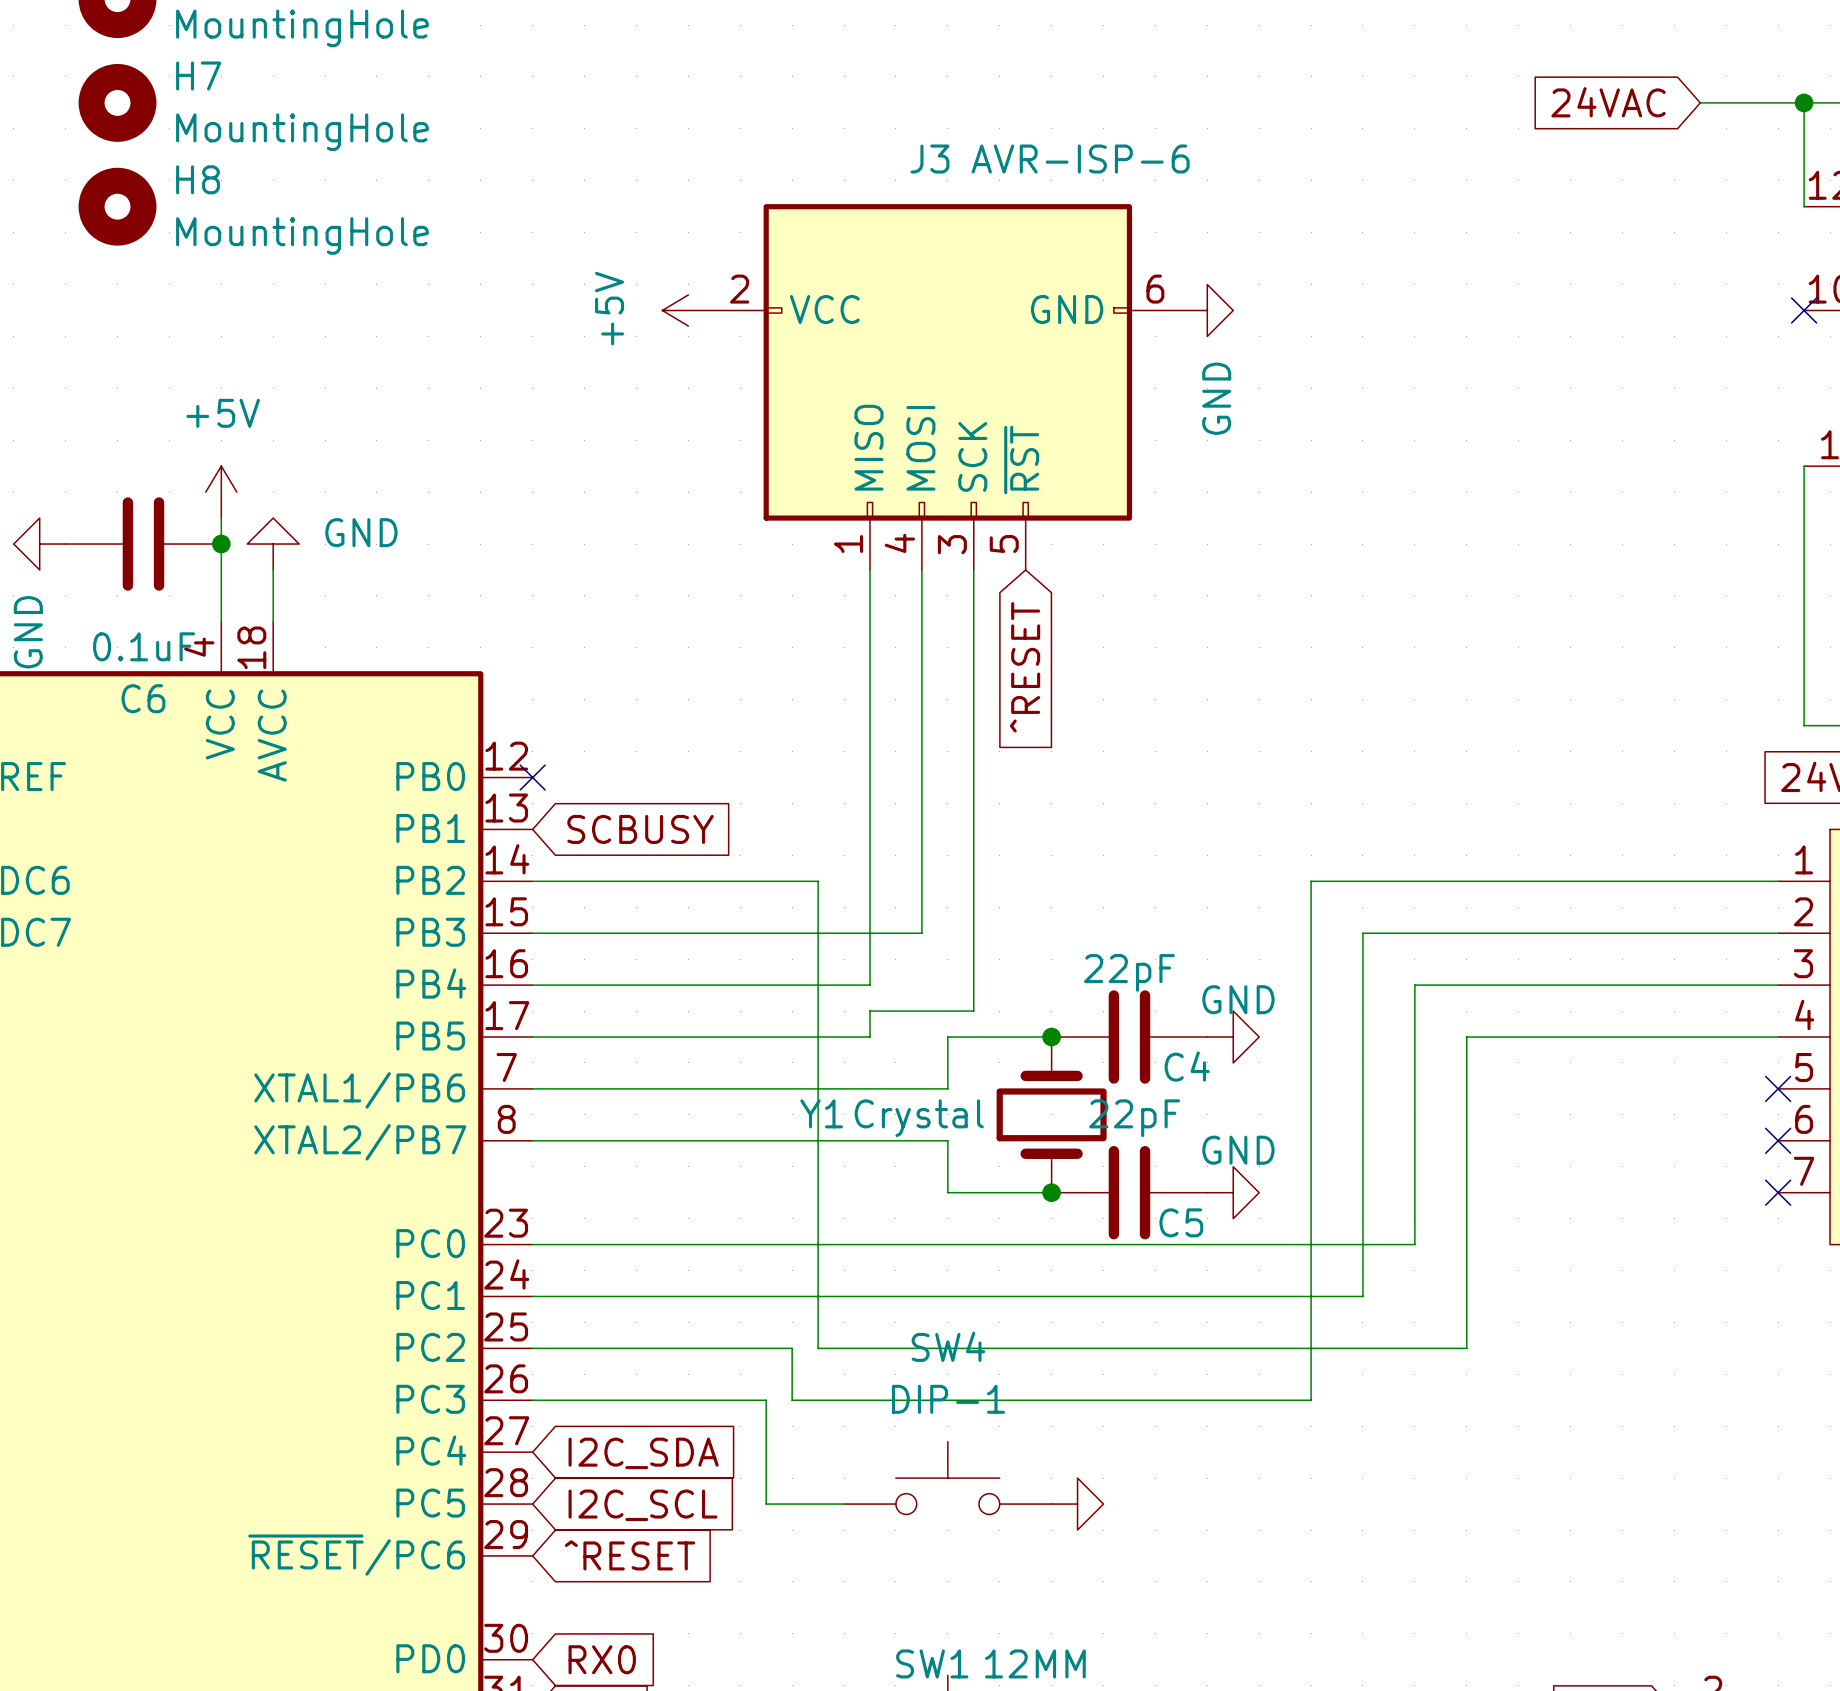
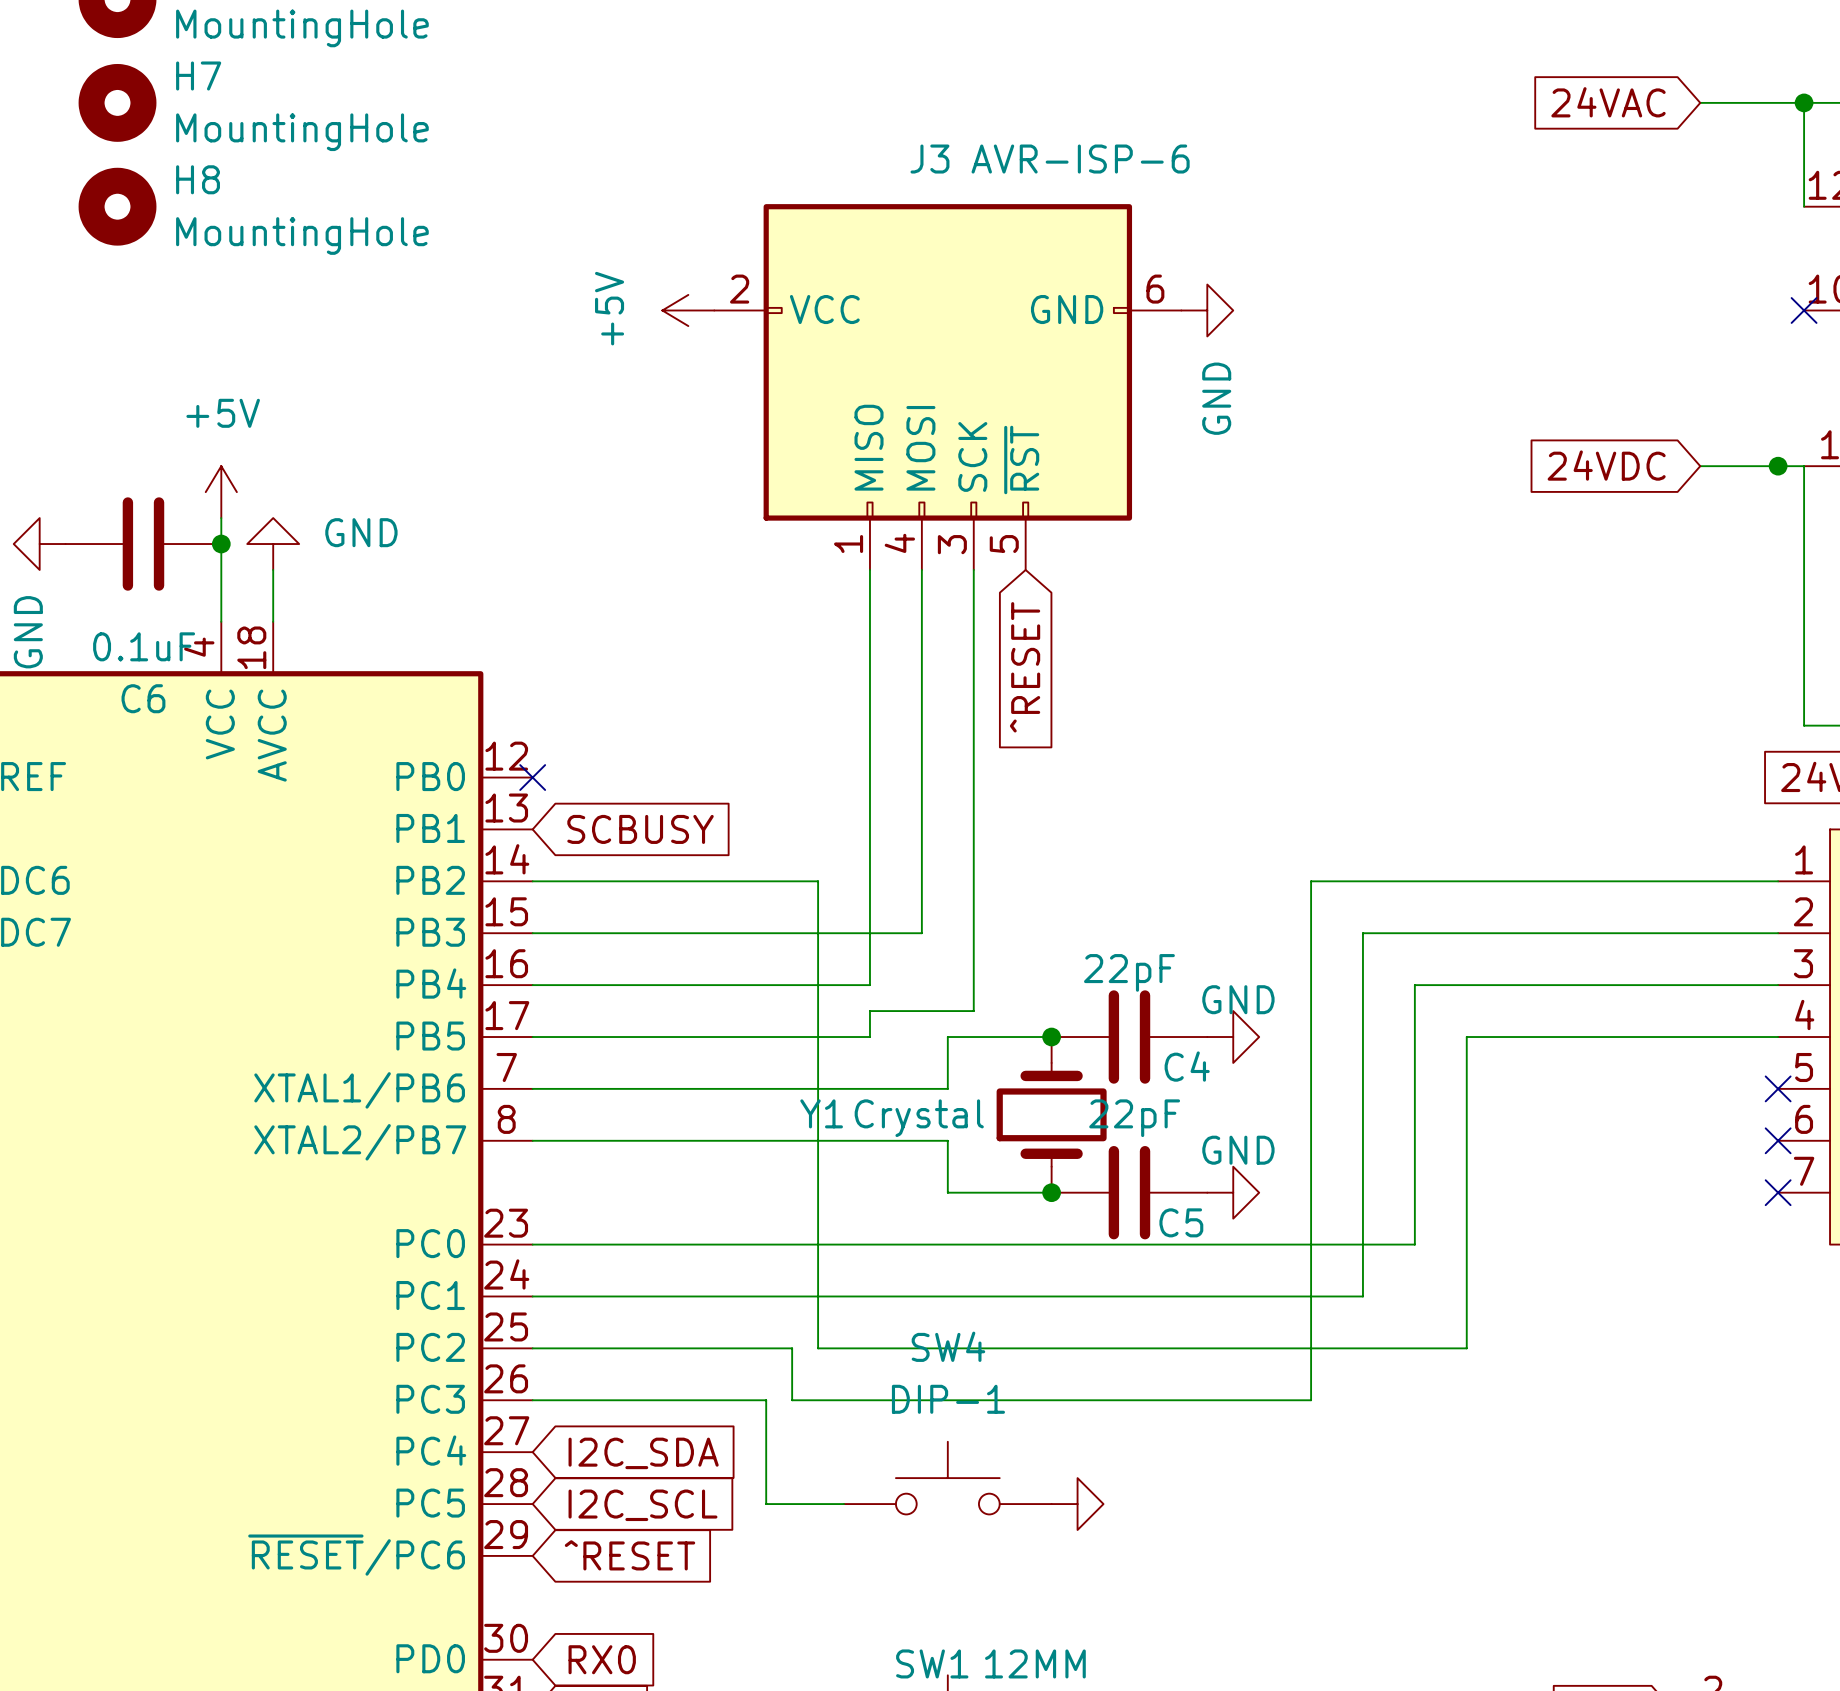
global label: none -> 24VDC (1606, 465)
wire: none -> (1700, 466) (1804, 466)
junction: none -> (1778, 466)

